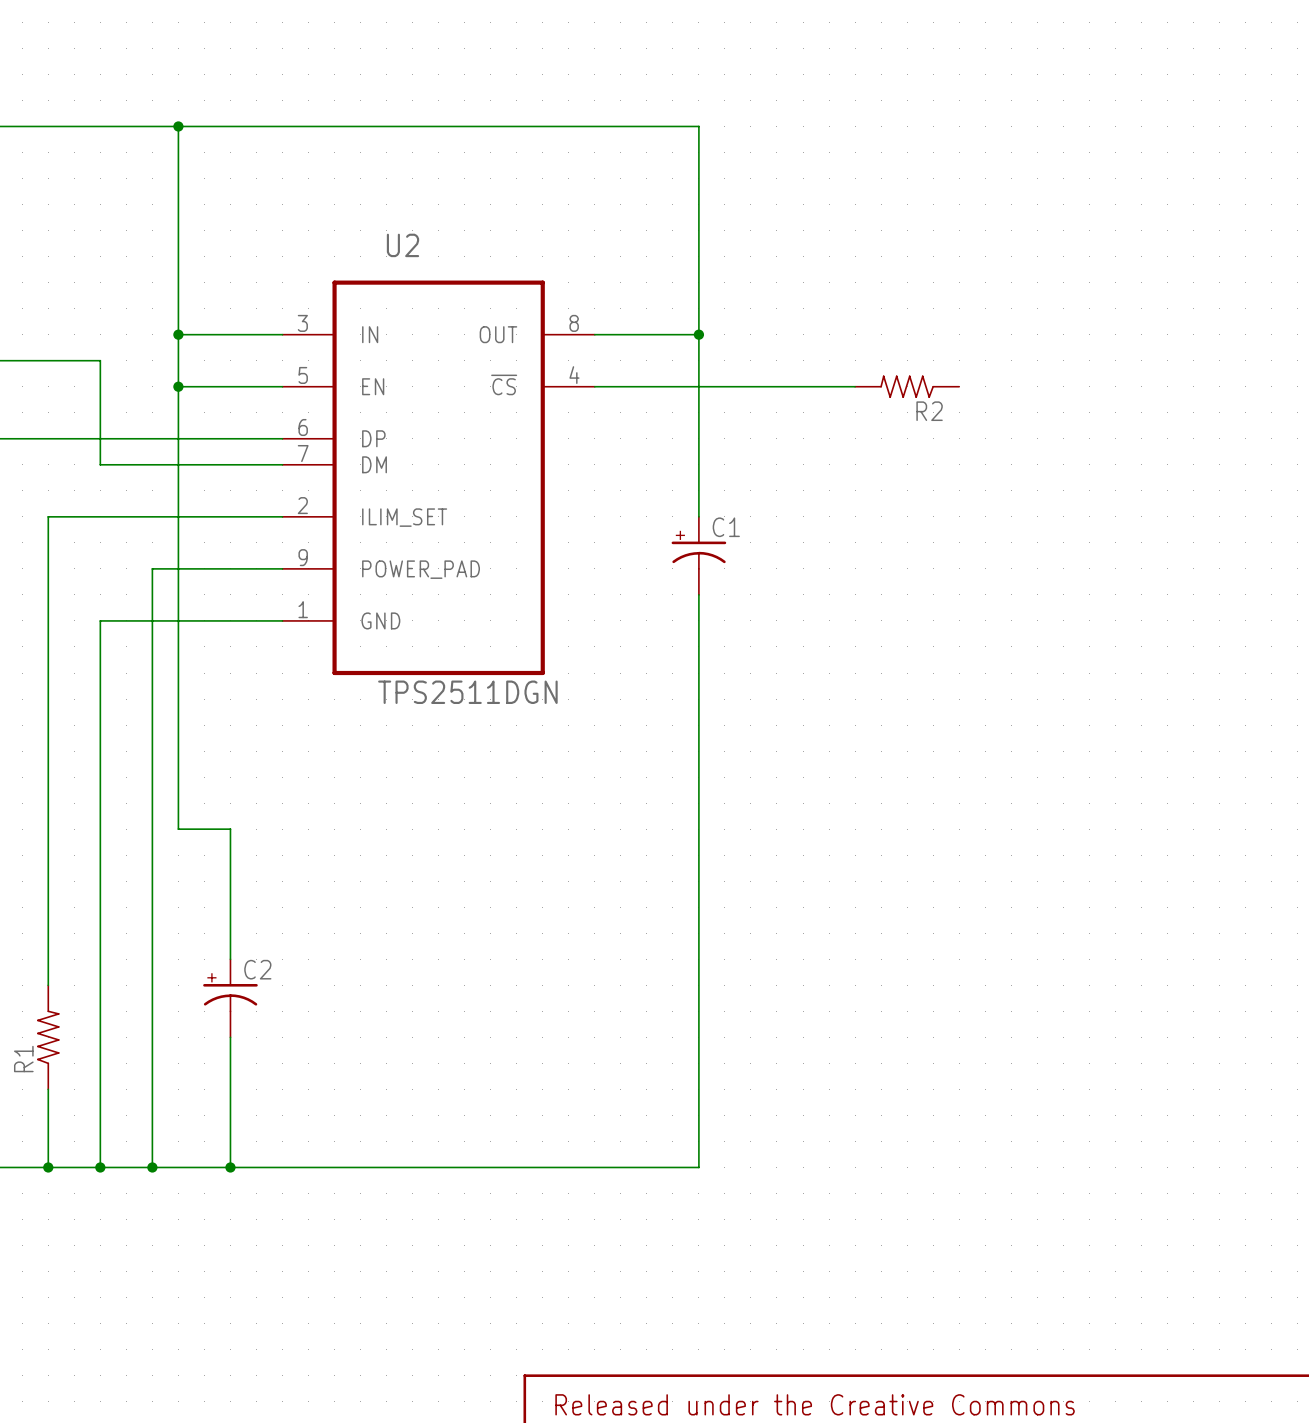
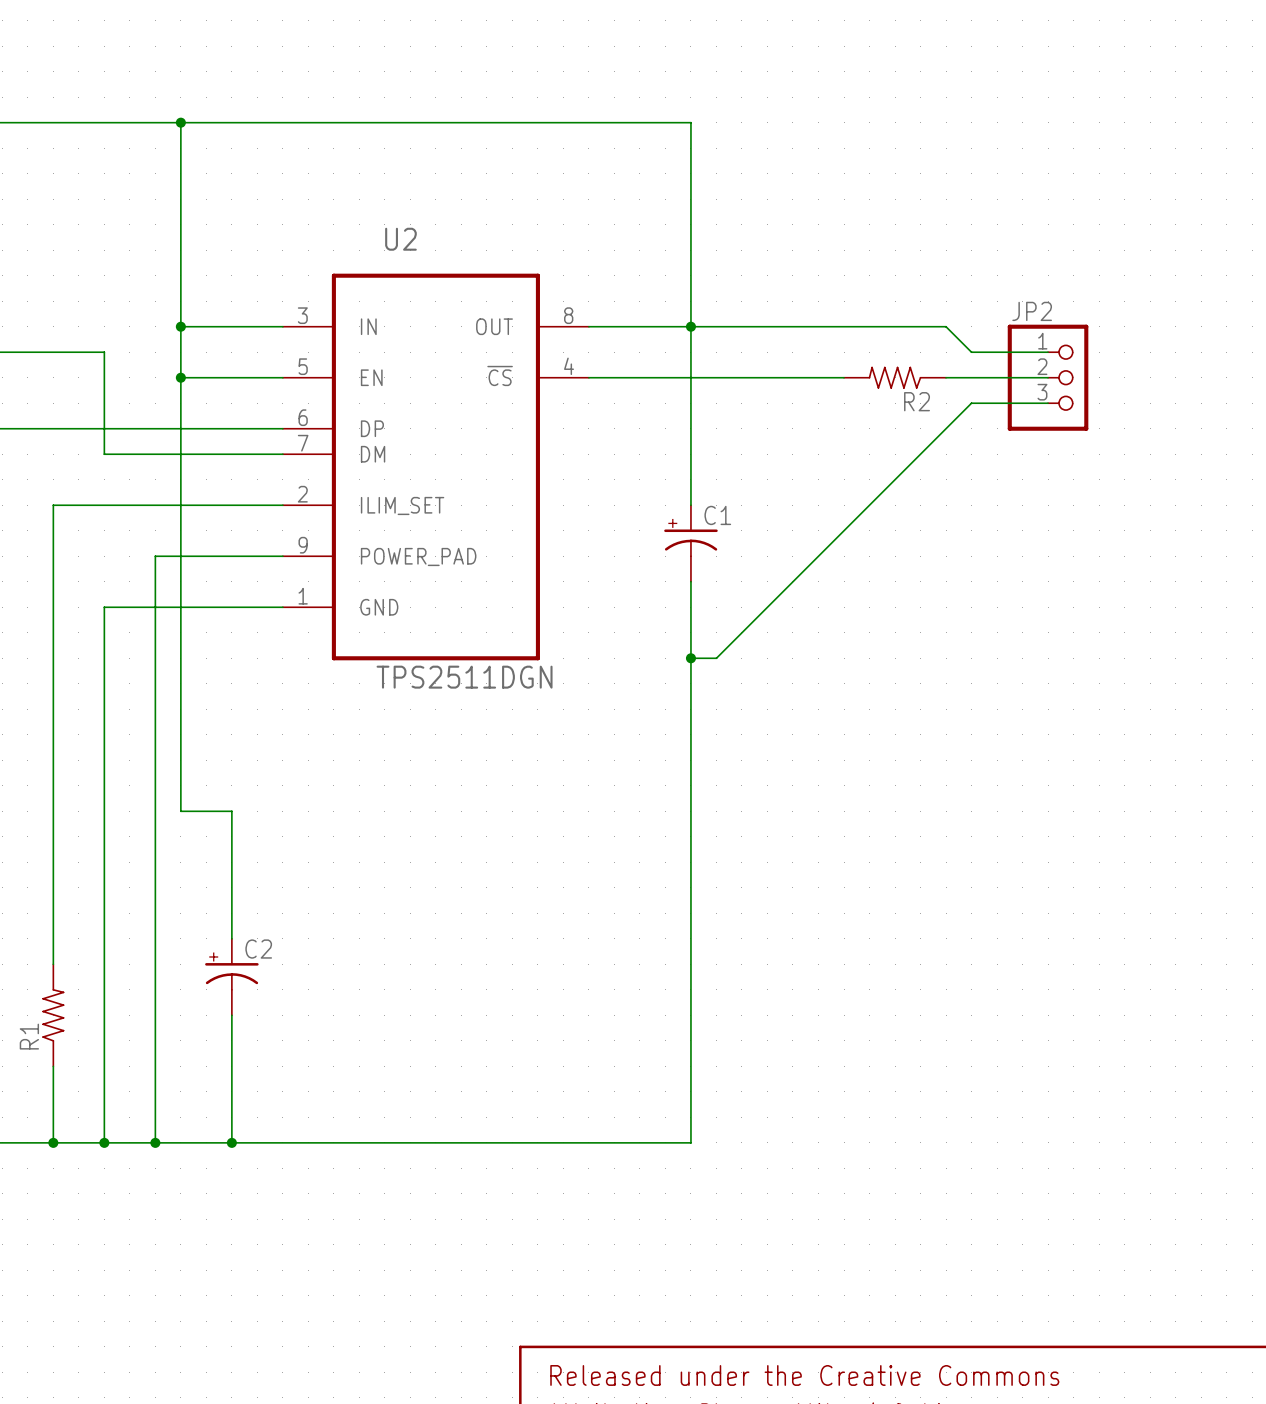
wire: none -> (690, 326) (946, 326) (971, 352) (1048, 352)
wire: none -> (946, 377) (1048, 377)
JP2: none -> (1048, 377)
wire: none -> (1048, 403) (971, 403) (716, 658) (690, 658)
junction: none -> (690, 658)

